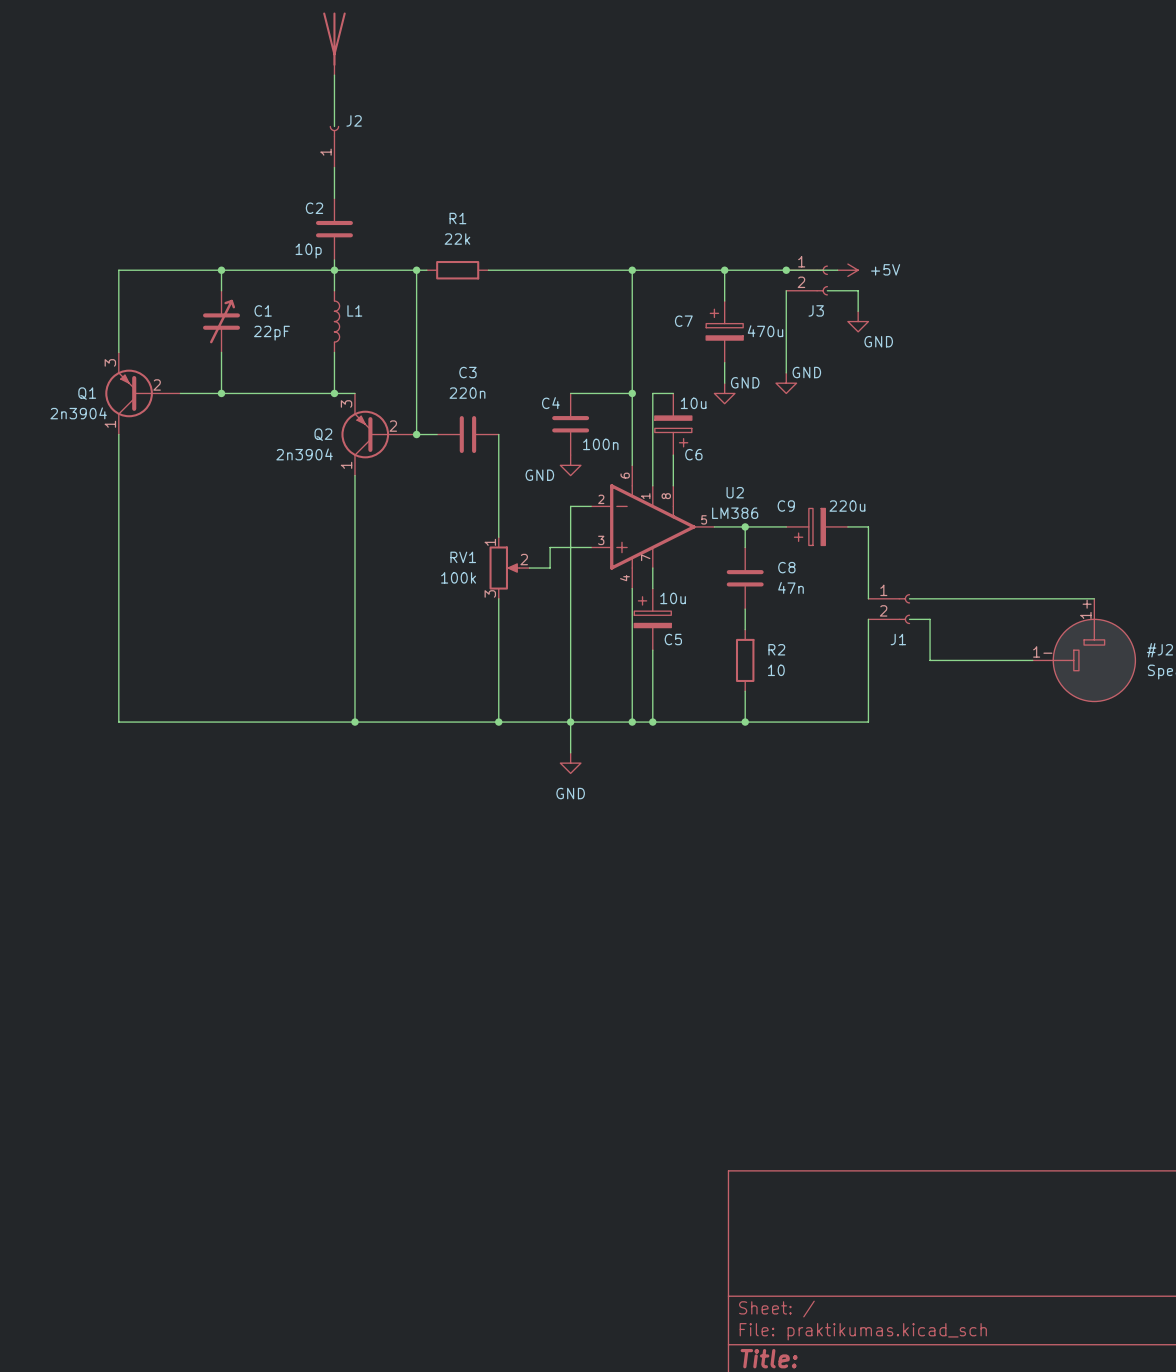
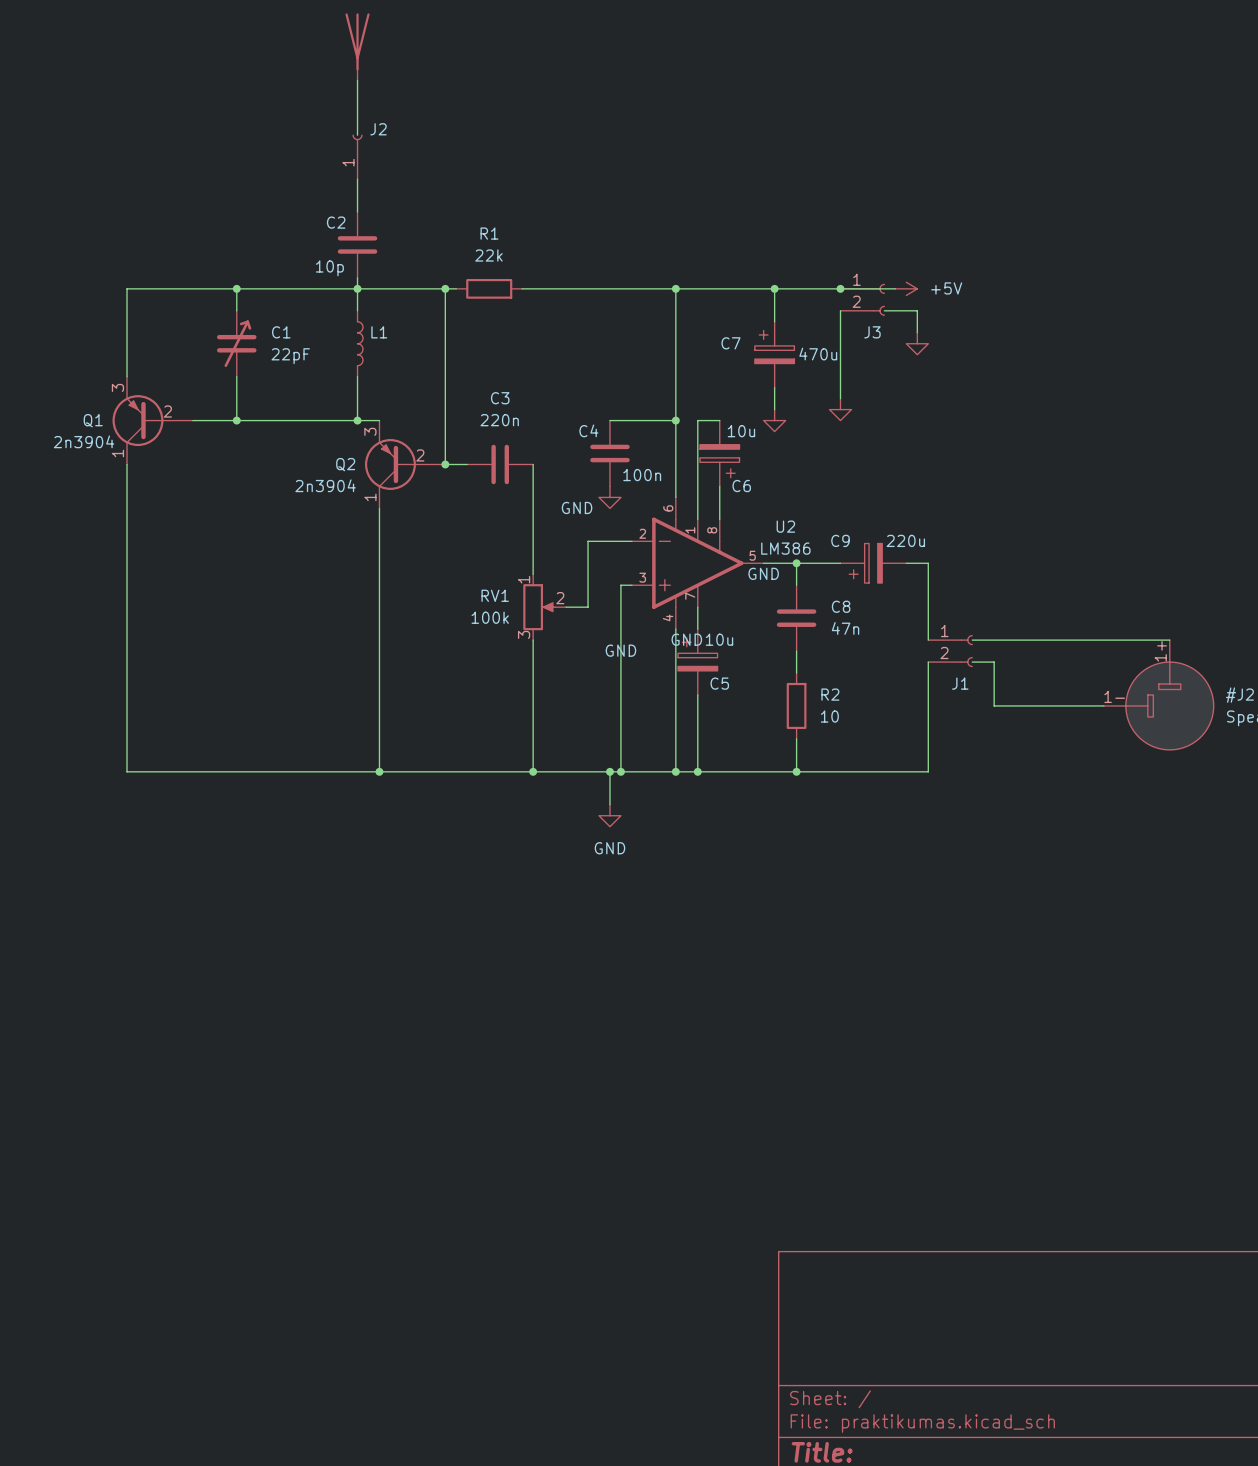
power symbol text position: GND (878, 341) -> GND (763, 573)
power symbol text position: GND (806, 372) -> GND (686, 639)
power symbol text position: GND (745, 382) -> GND (620, 650)
wire: (570, 506) (570, 722) -> none
wire: (550, 547) (580, 547) -> (588, 585) (588, 541) (609, 541)
wire: none -> (620, 585) (620, 771)
junction: none -> (620, 771)

